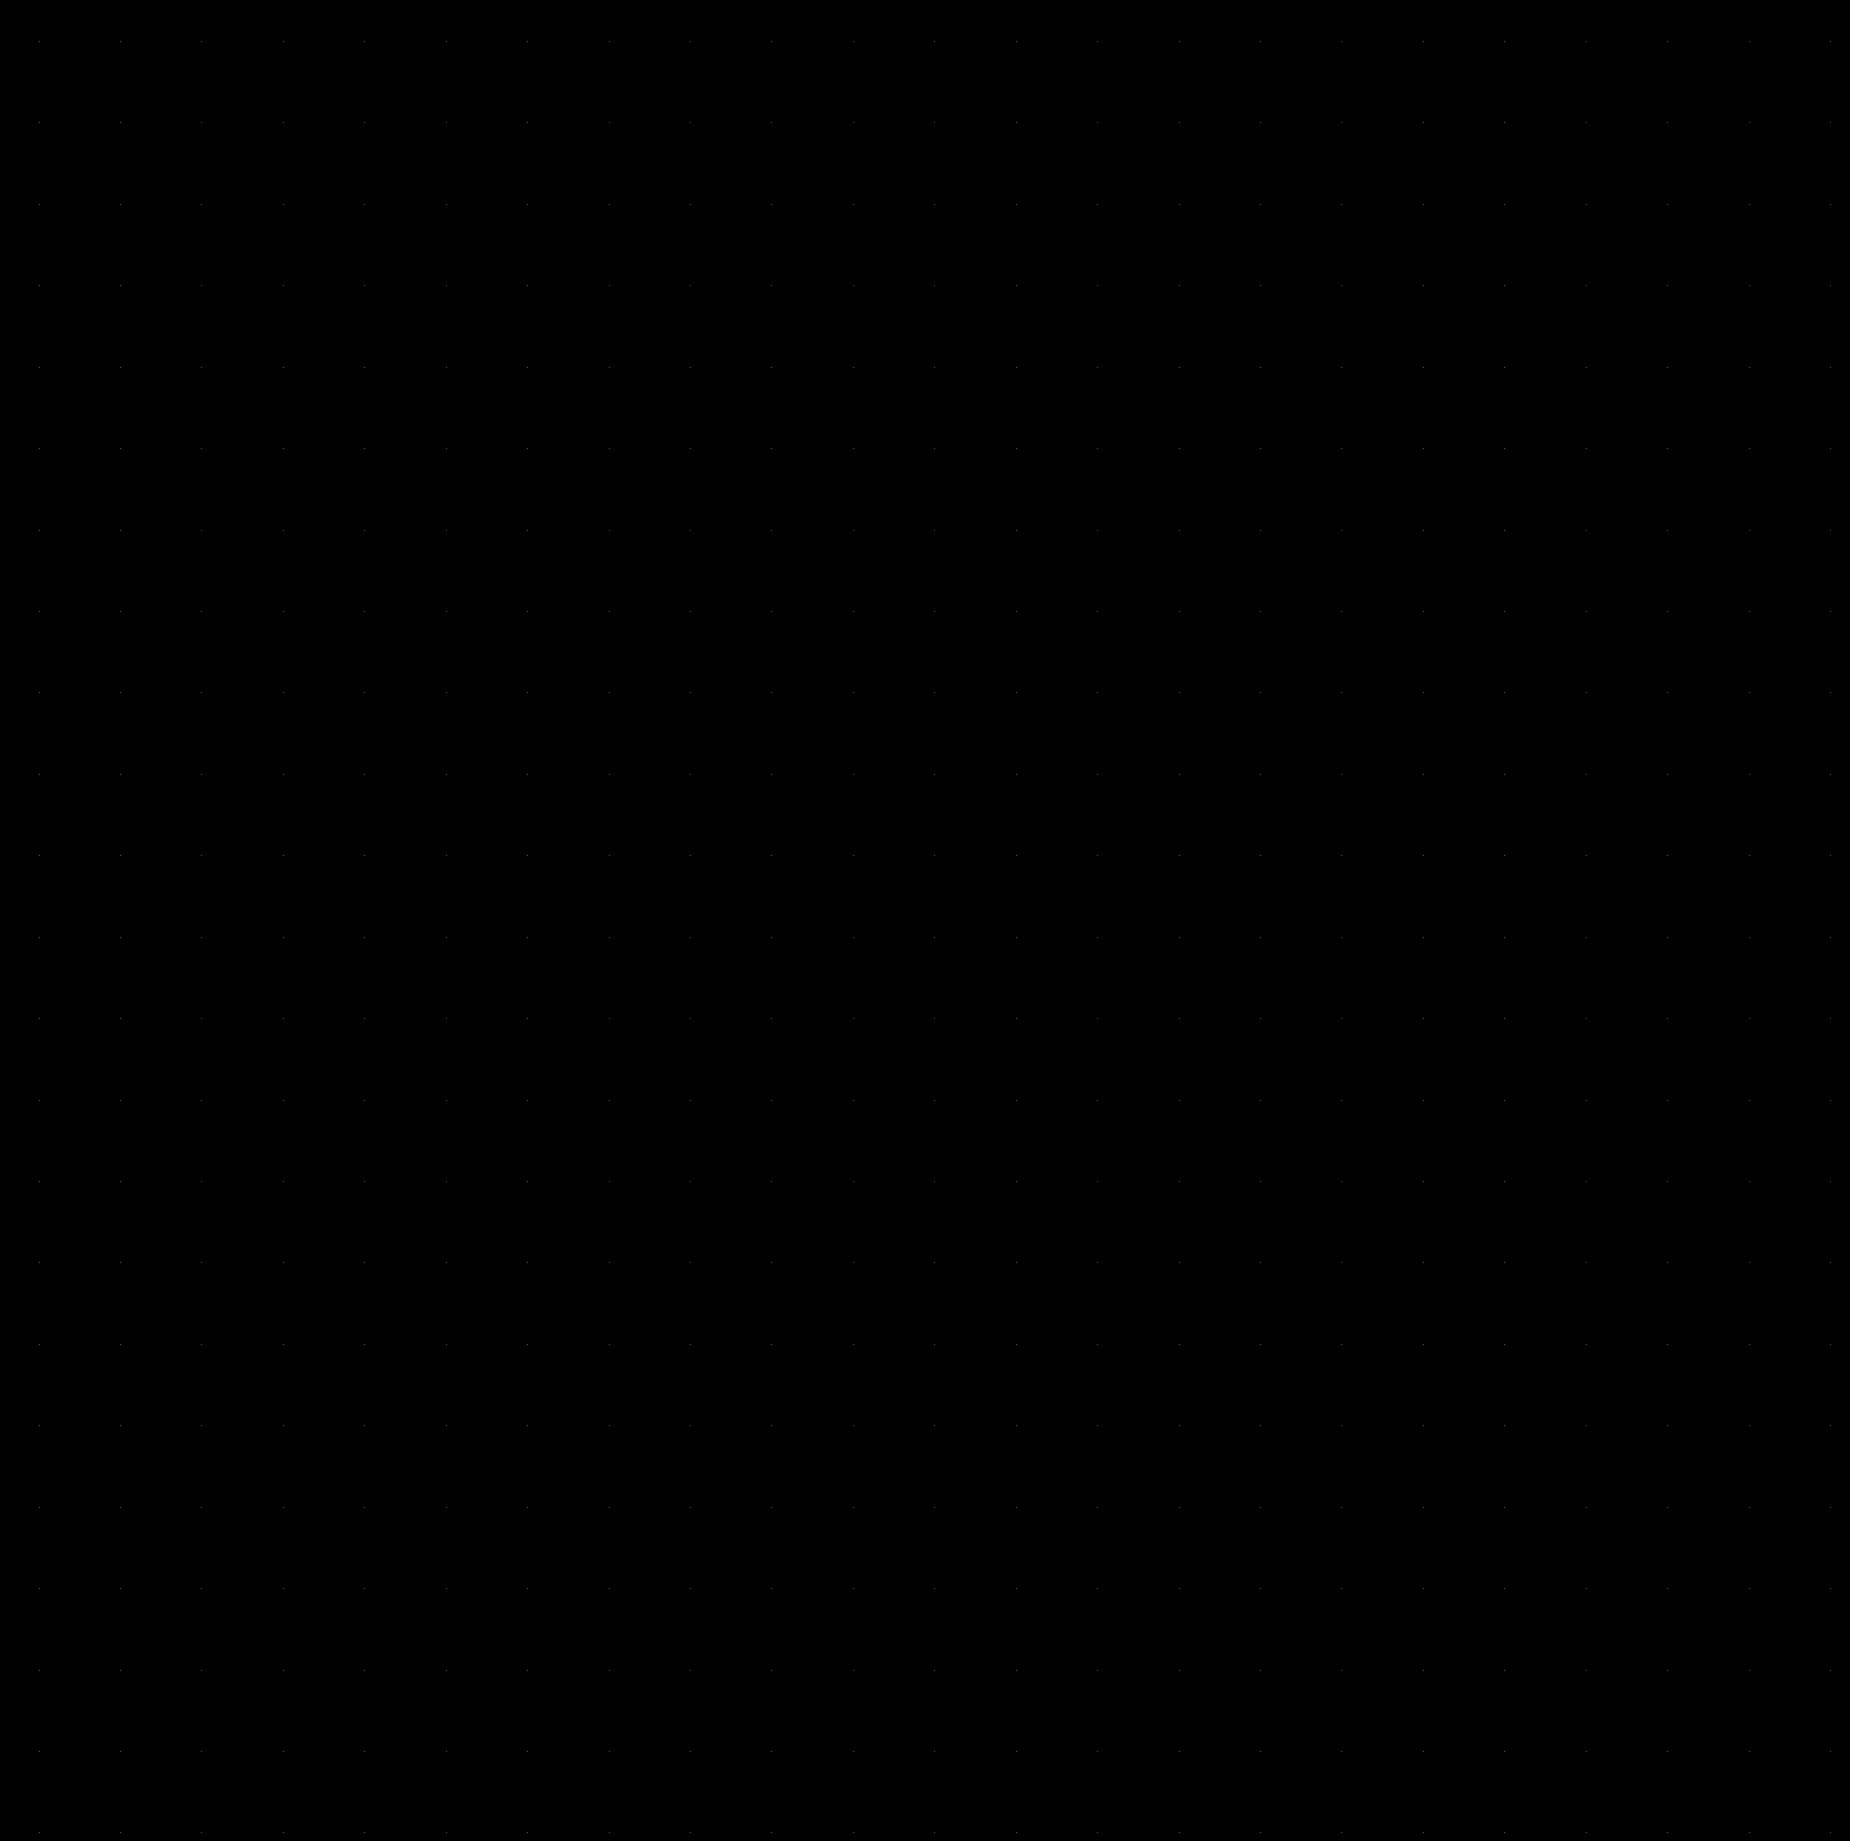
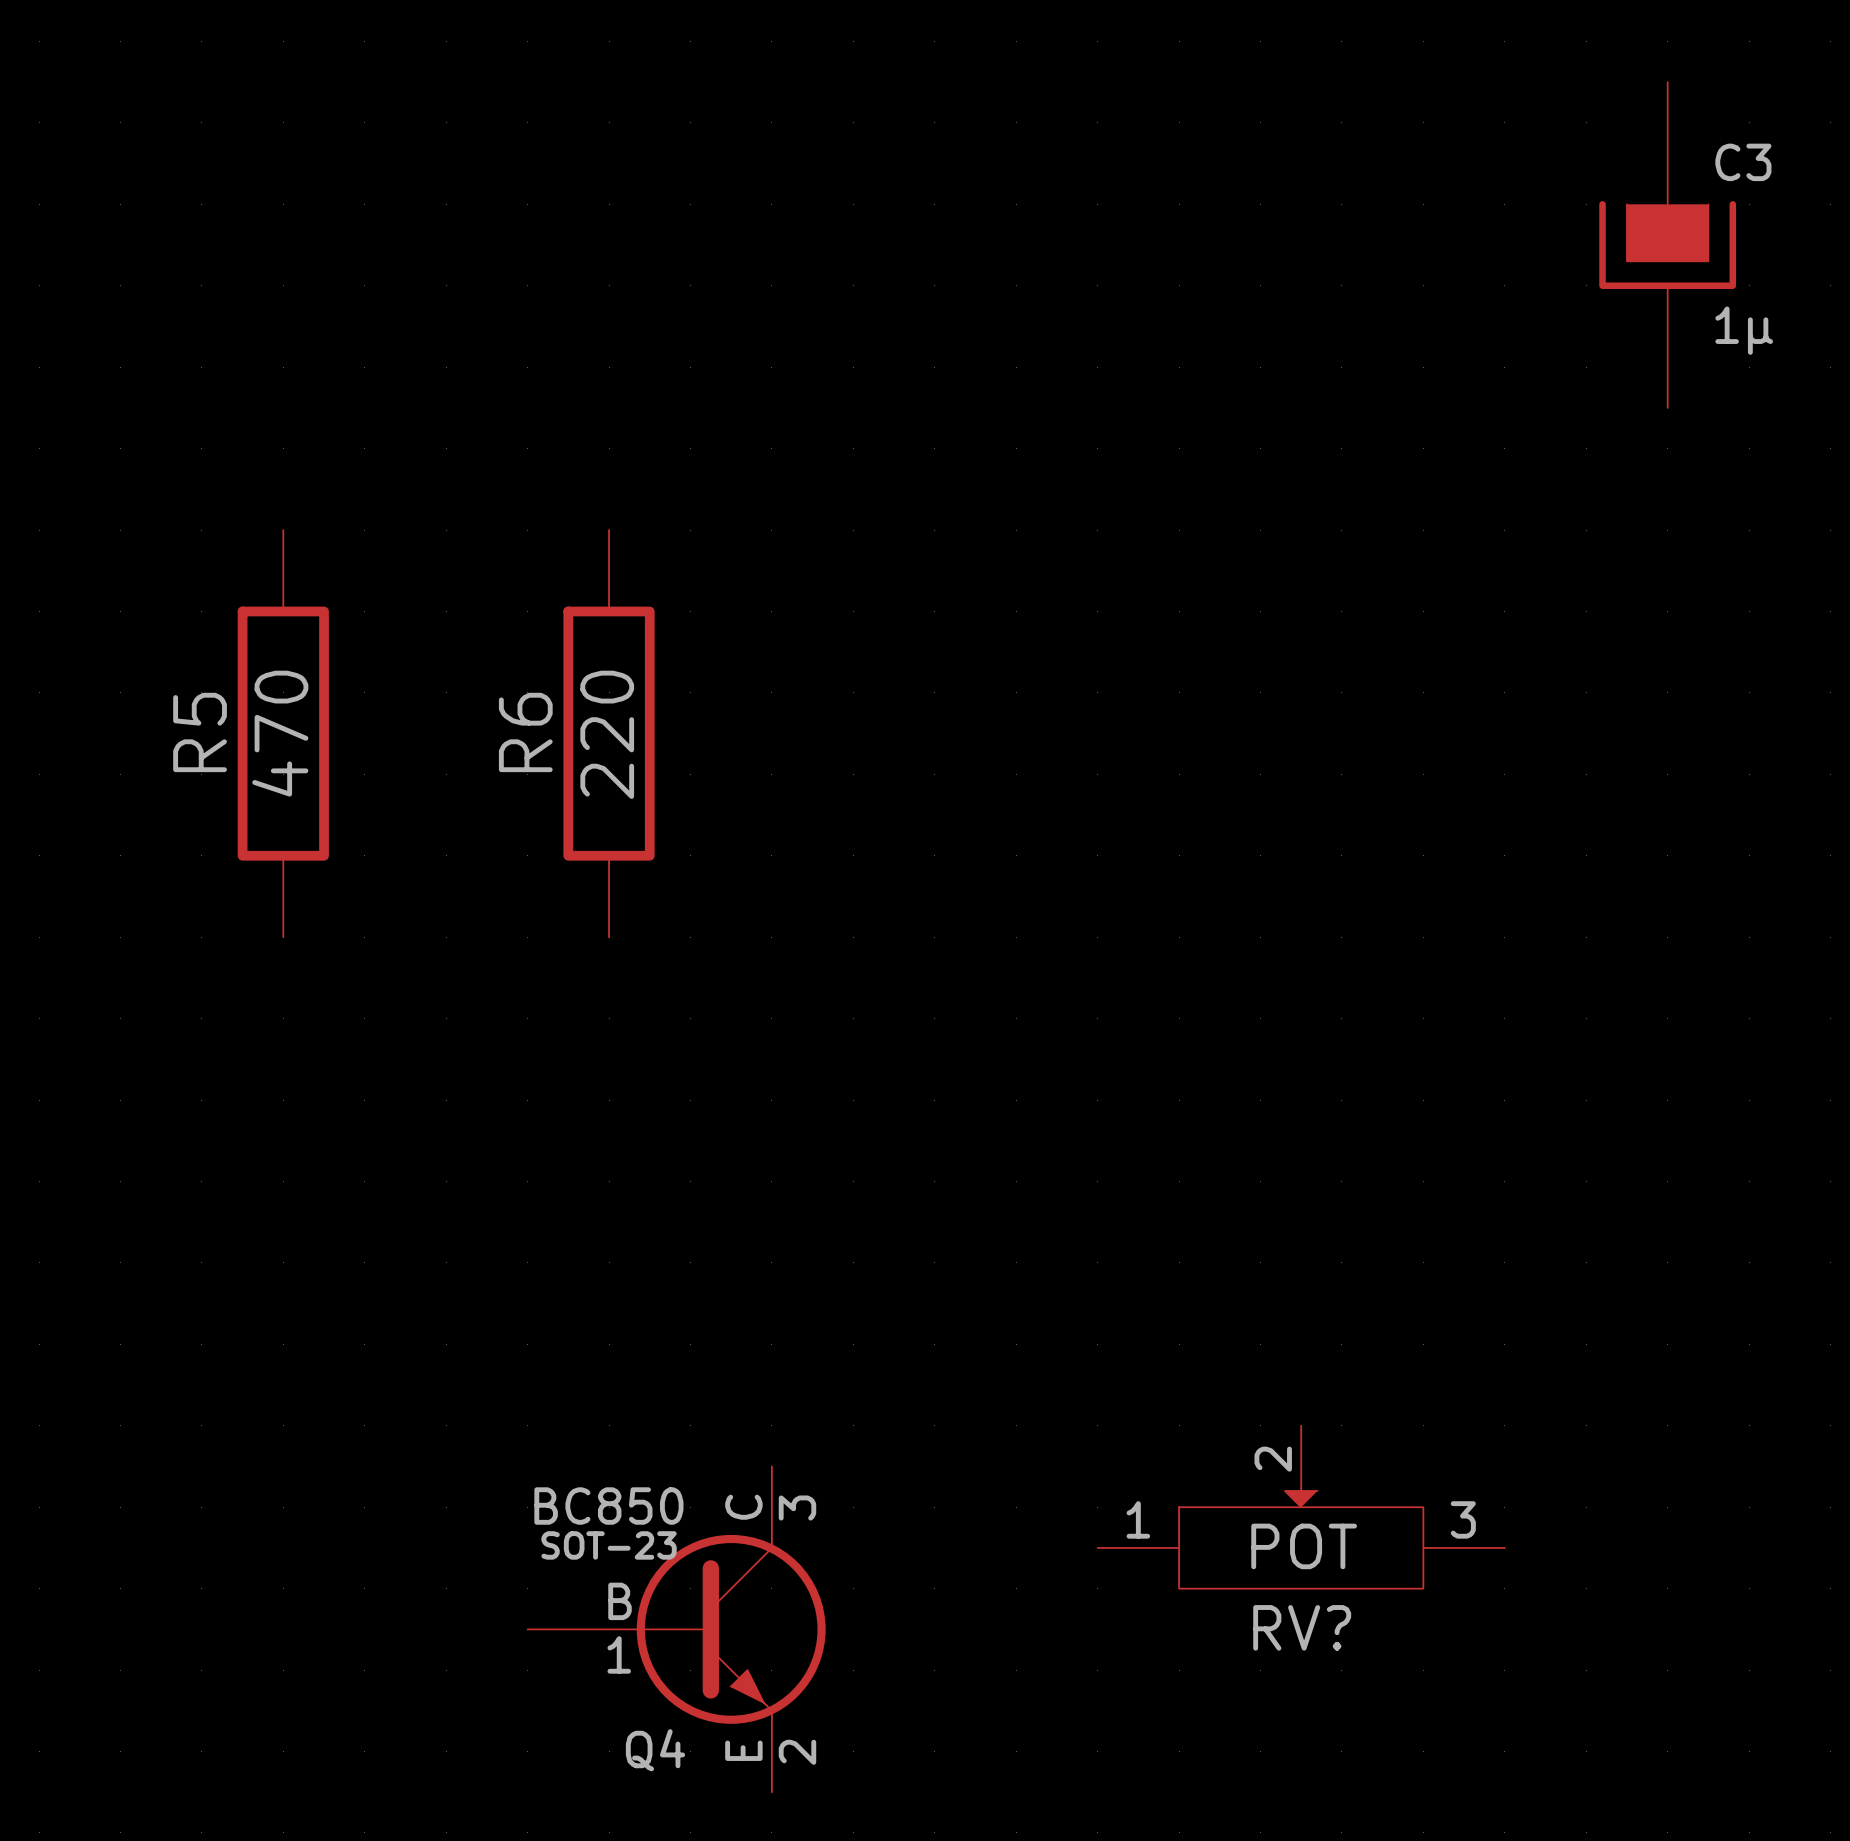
C3: none -> 1µ (1667, 245)
R5: none -> 470 (283, 733)
R6: none -> 220 (609, 733)
RV?: none -> POT (1301, 1507)
Q4: none -> BC850 (676, 1629)

